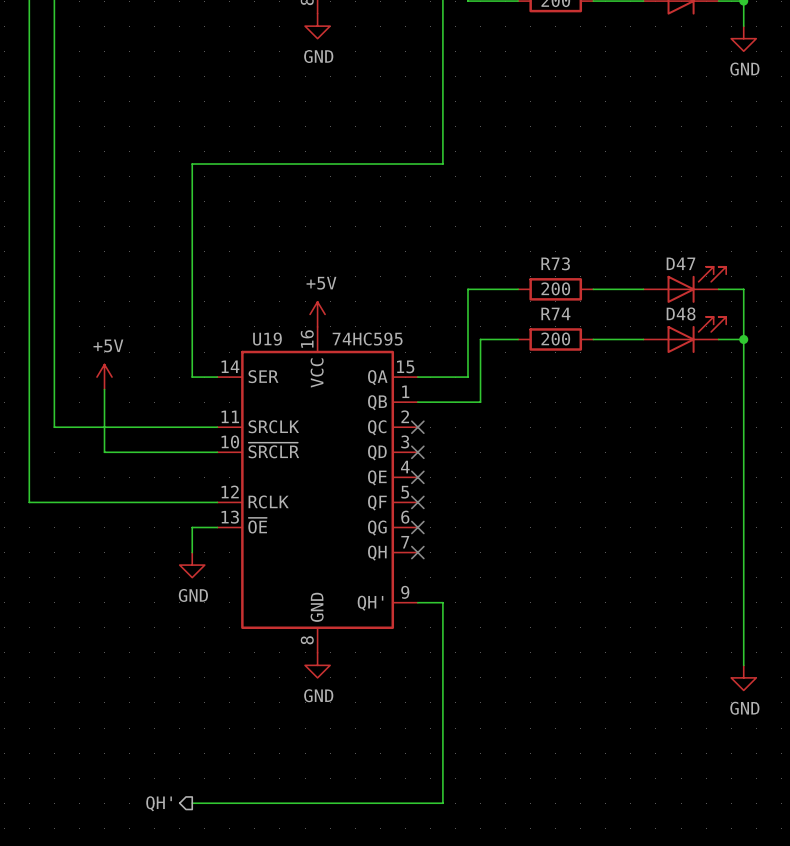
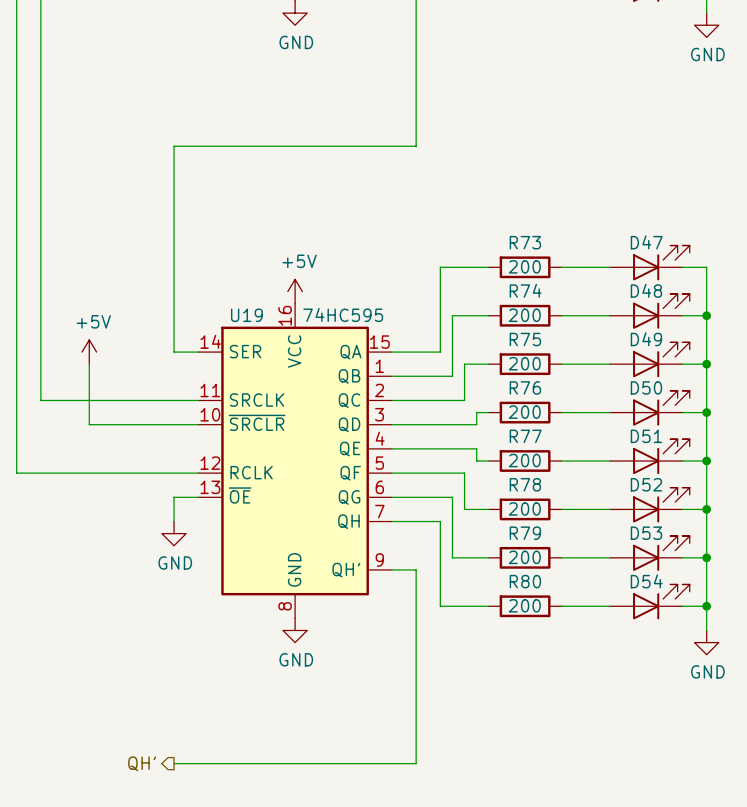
D49: none -> (649, 359)
wire: none -> (488, 364) (464, 364) (464, 400) (391, 400)
R75: none -> 200 (525, 364)
wire: none -> (561, 364) (609, 364)
wire: none -> (682, 364) (706, 364)
junction: none -> (706, 364)
no-connect mark: (417, 427) -> none
D50: none -> (649, 408)
wire: none -> (488, 412) (476, 412) (476, 424) (391, 424)
R76: none -> 200 (525, 412)
wire: none -> (561, 412) (609, 412)
wire: none -> (682, 412) (706, 412)
junction: none -> (706, 412)
no-connect mark: (417, 452) -> none
wire: none -> (391, 448) (476, 448) (476, 461) (488, 461)
no-connect mark: (417, 477) -> none
D51: none -> (649, 456)
R77: none -> 200 (525, 461)
wire: none -> (561, 461) (609, 461)
wire: none -> (682, 461) (706, 461)
junction: none -> (706, 461)
wire: none -> (391, 473) (464, 473) (464, 509) (488, 509)
no-connect mark: (417, 502) -> none
wire: none -> (391, 497) (452, 497) (452, 557) (488, 557)
no-connect mark: (417, 527) -> none
D52: none -> (649, 505)
R78: none -> 200 (525, 509)
wire: none -> (561, 509) (609, 509)
wire: none -> (682, 509) (706, 509)
junction: none -> (706, 509)
wire: none -> (391, 521) (440, 521) (440, 606) (488, 606)
no-connect mark: (417, 552) -> none
D53: none -> (649, 553)
R79: none -> 200 (525, 557)
wire: none -> (561, 557) (609, 557)
wire: none -> (682, 557) (706, 557)
junction: none -> (706, 557)
D54: none -> (649, 601)
R80: none -> 200 (525, 606)
wire: none -> (561, 606) (609, 606)
wire: none -> (682, 606) (706, 606)
junction: none -> (706, 606)

